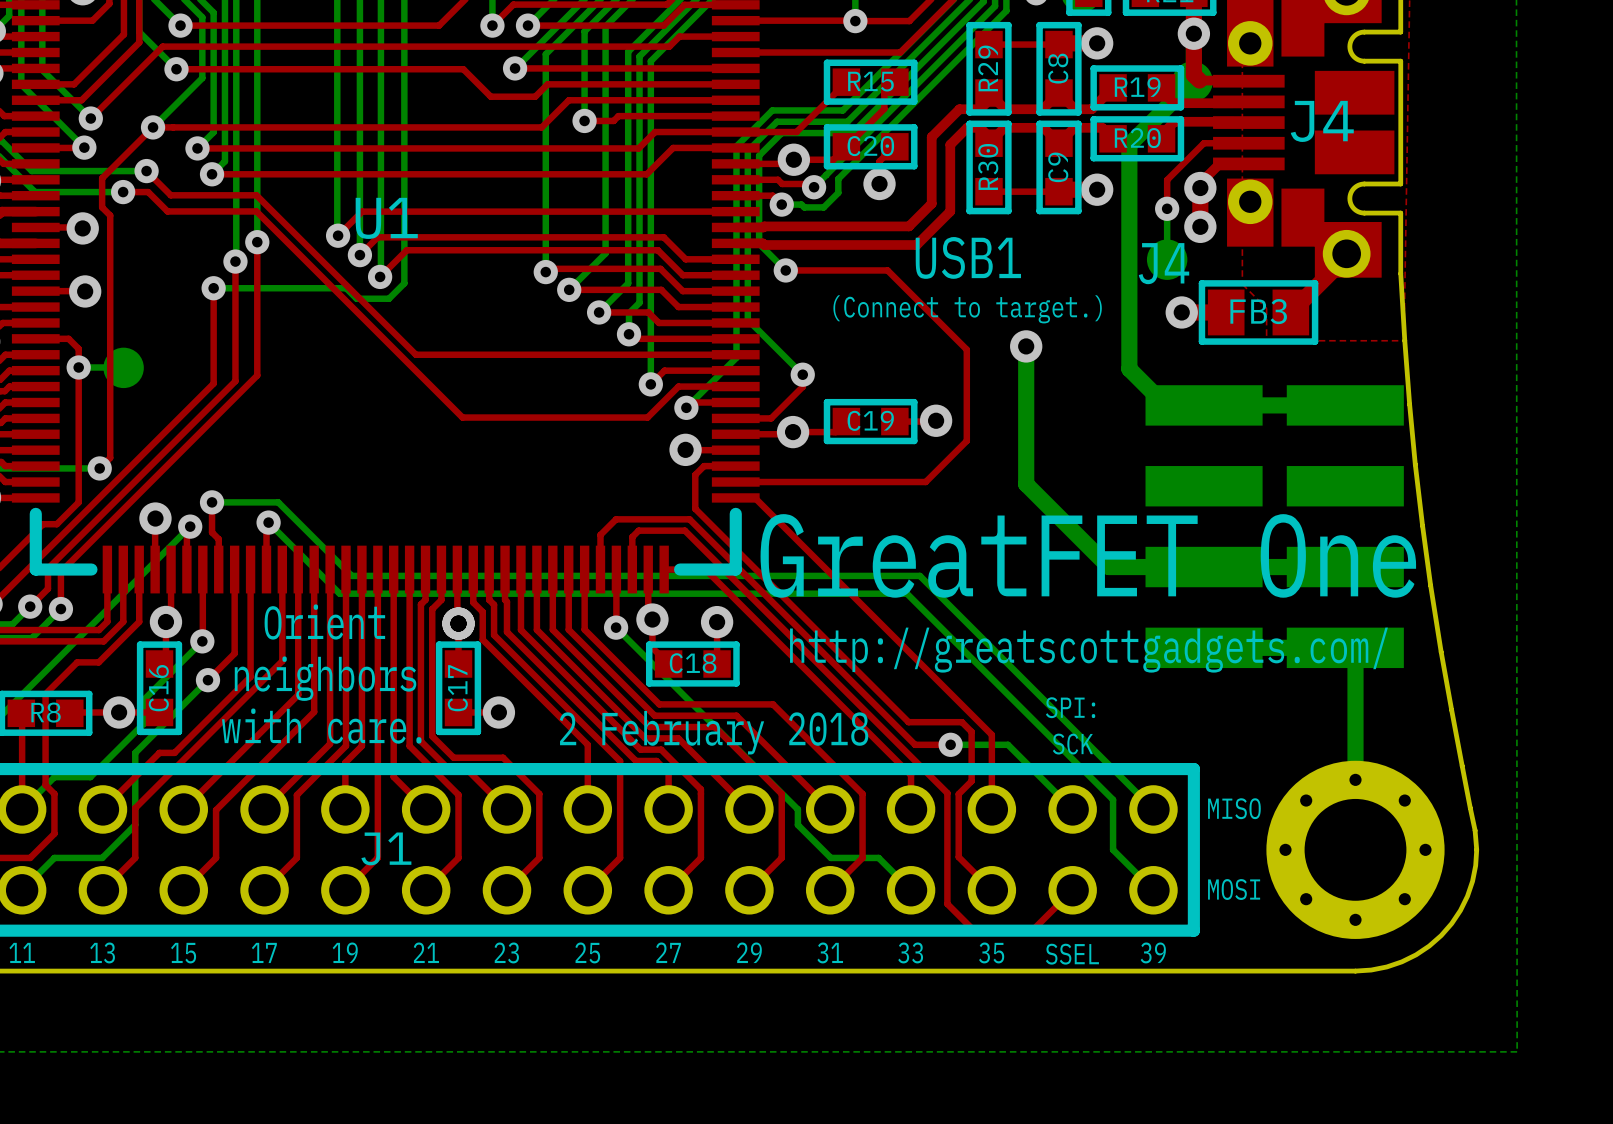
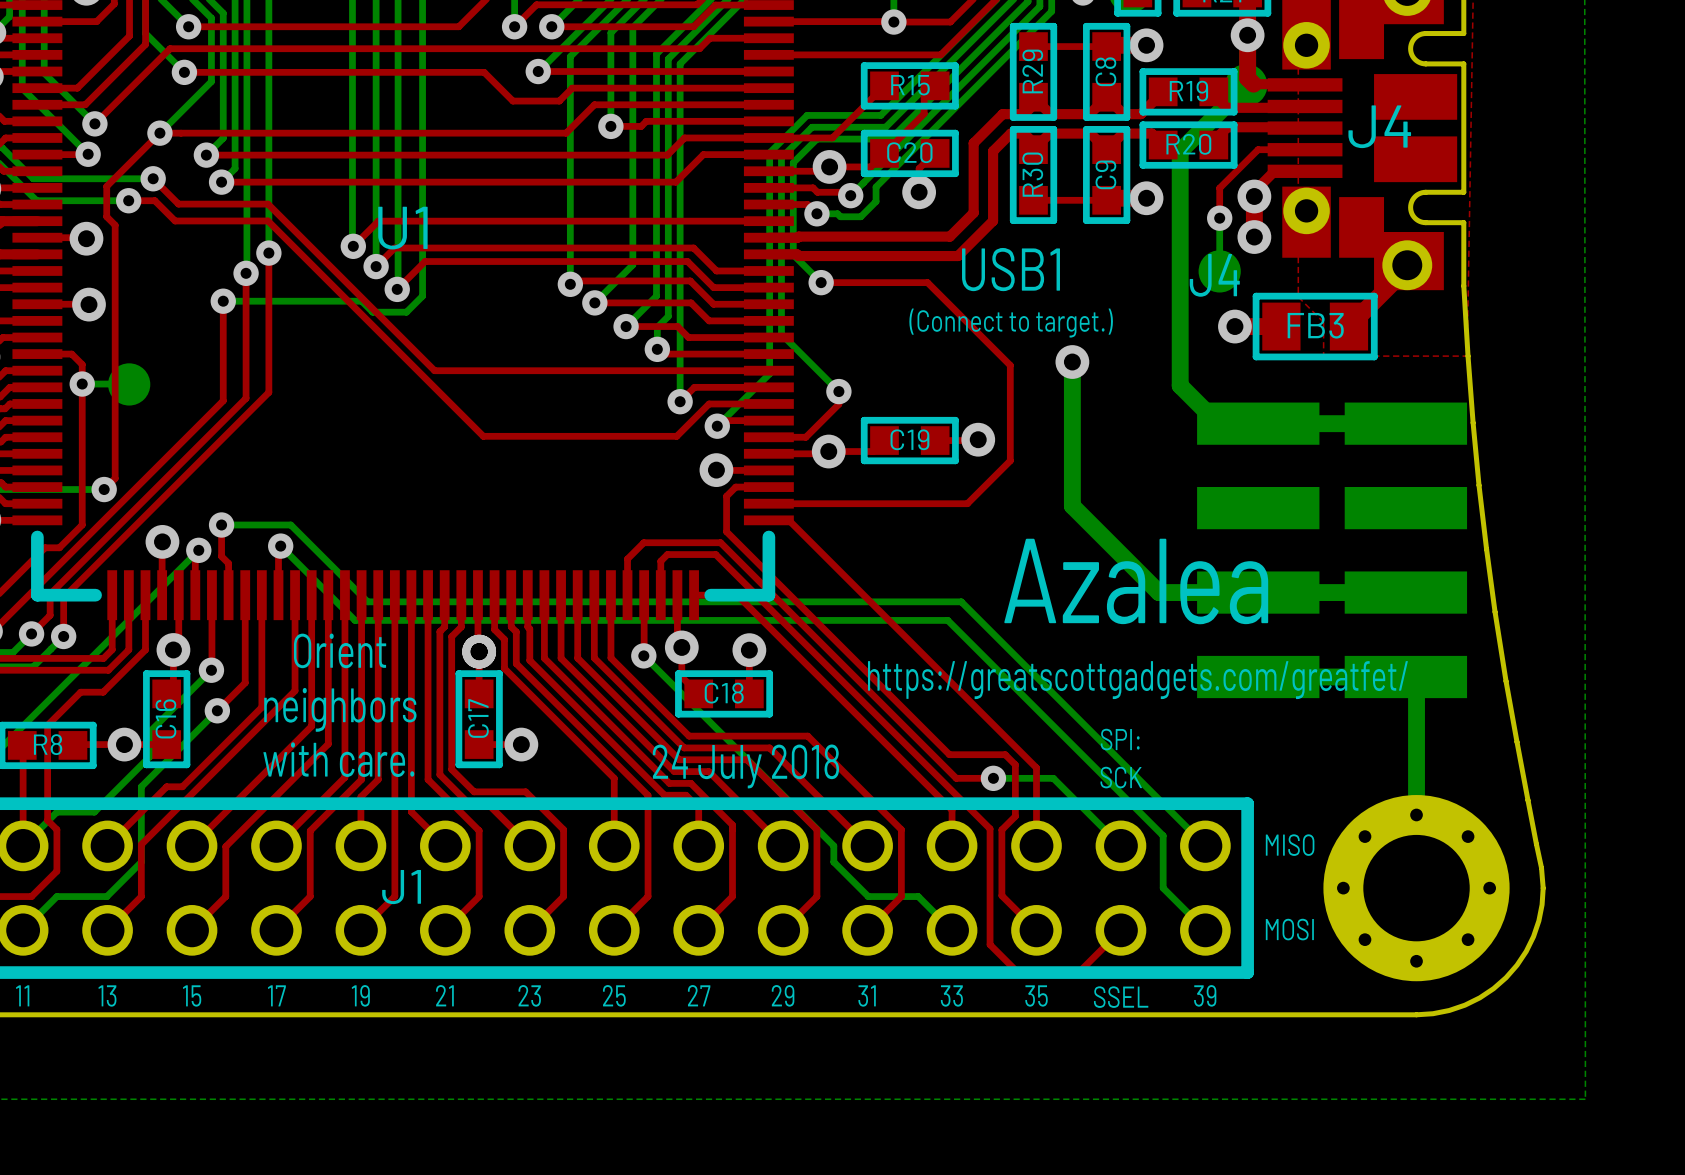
text: GreatFET One (1088, 555) -> Azalea (1136, 581)
text: http://greatscottgadgets.com/ (1088, 650) -> https://greatscottgadgets.com/greatfet/ (1137, 680)
text: 2 February 2018 (714, 732) -> 24 July 2018 (745, 766)

